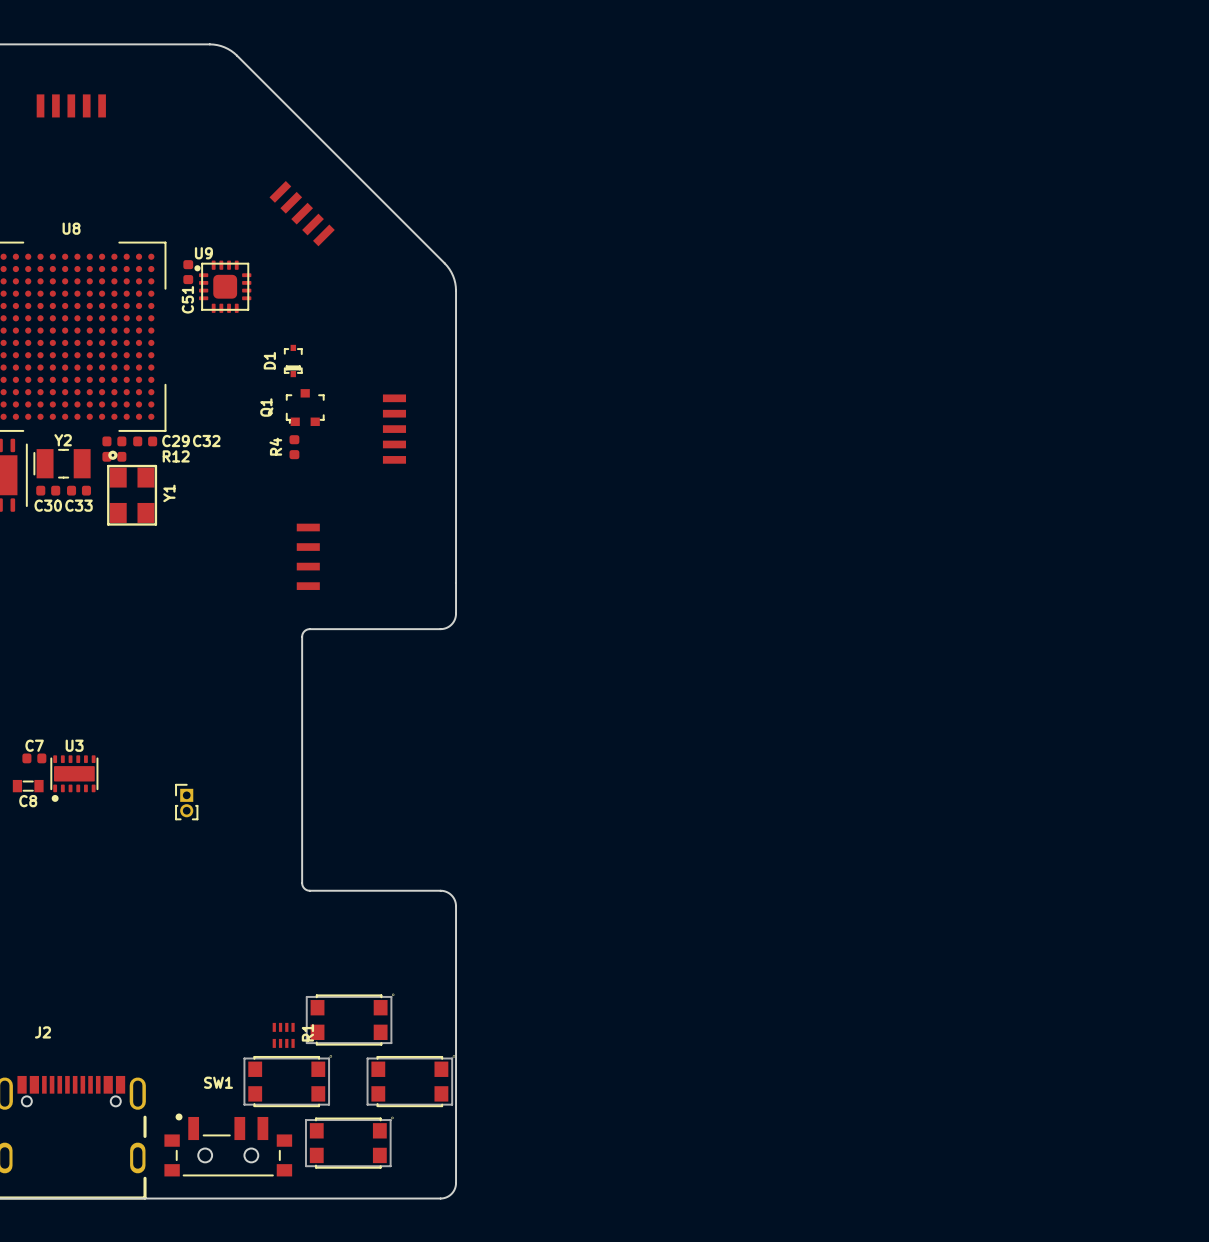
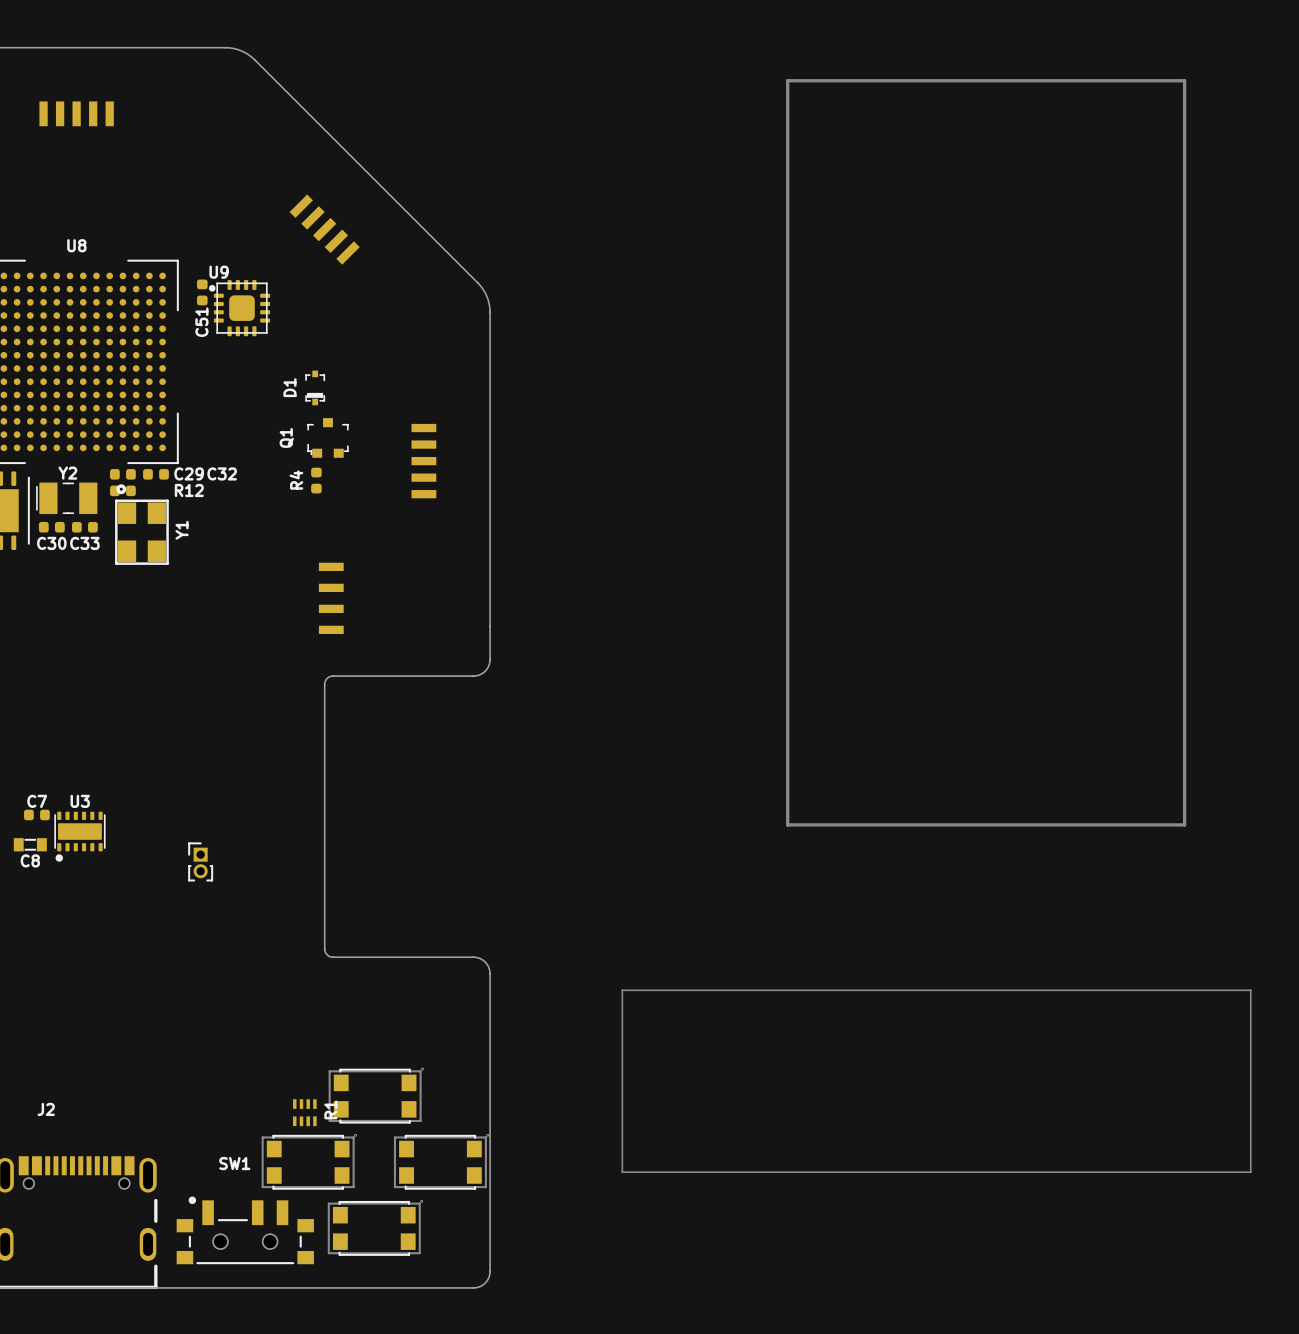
line: none -> (787, 80) (1184, 80) (1184, 824) (787, 824) (787, 80)
line: none -> (622, 990) (1250, 990) (1250, 1172) (622, 1172) (622, 990)

